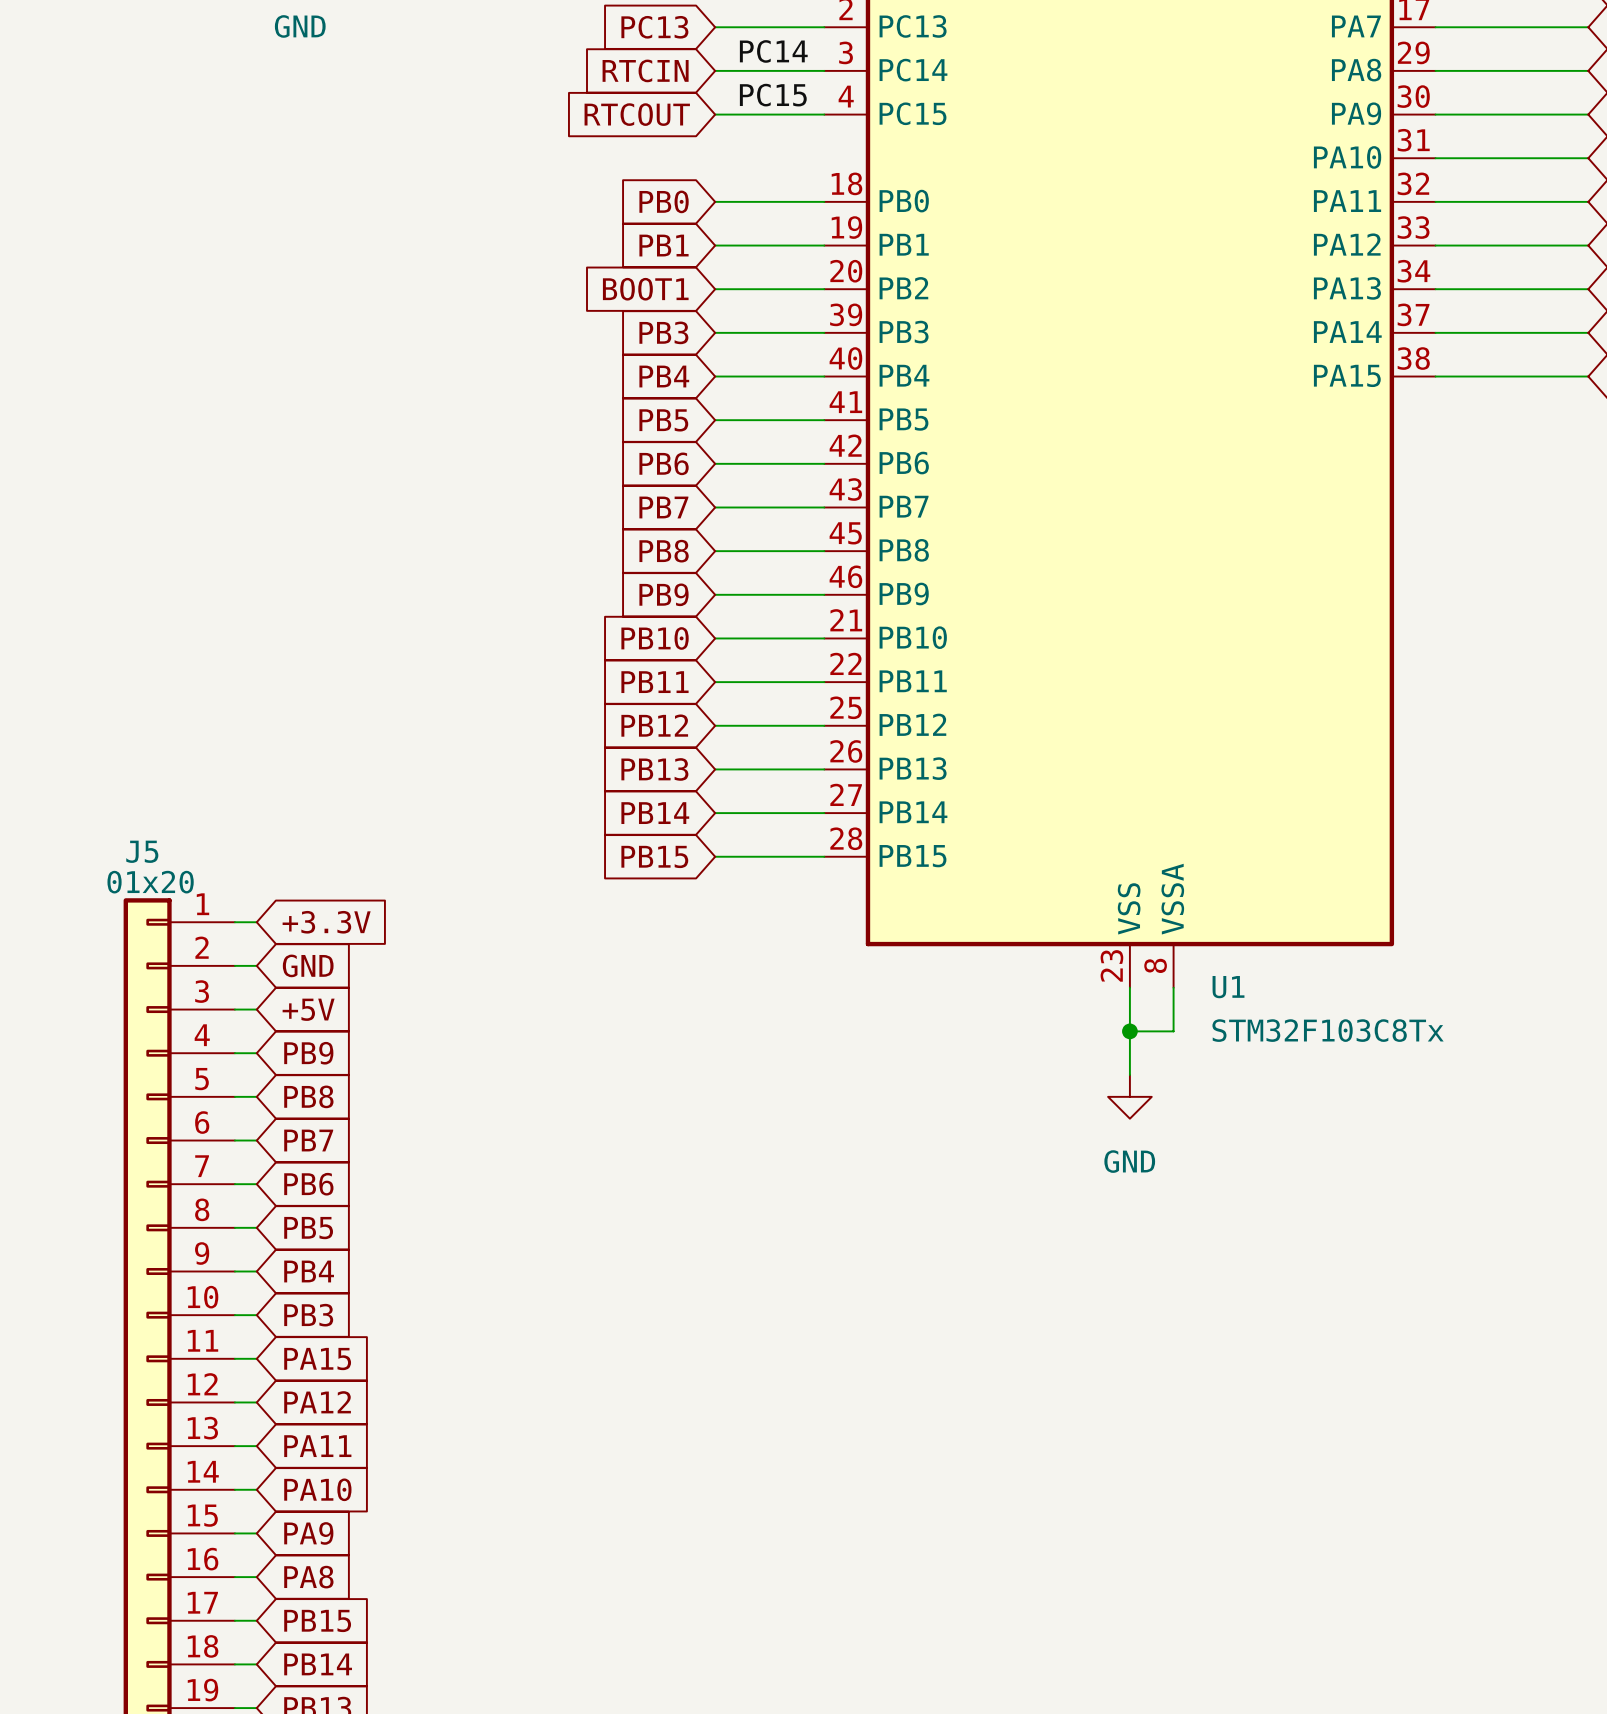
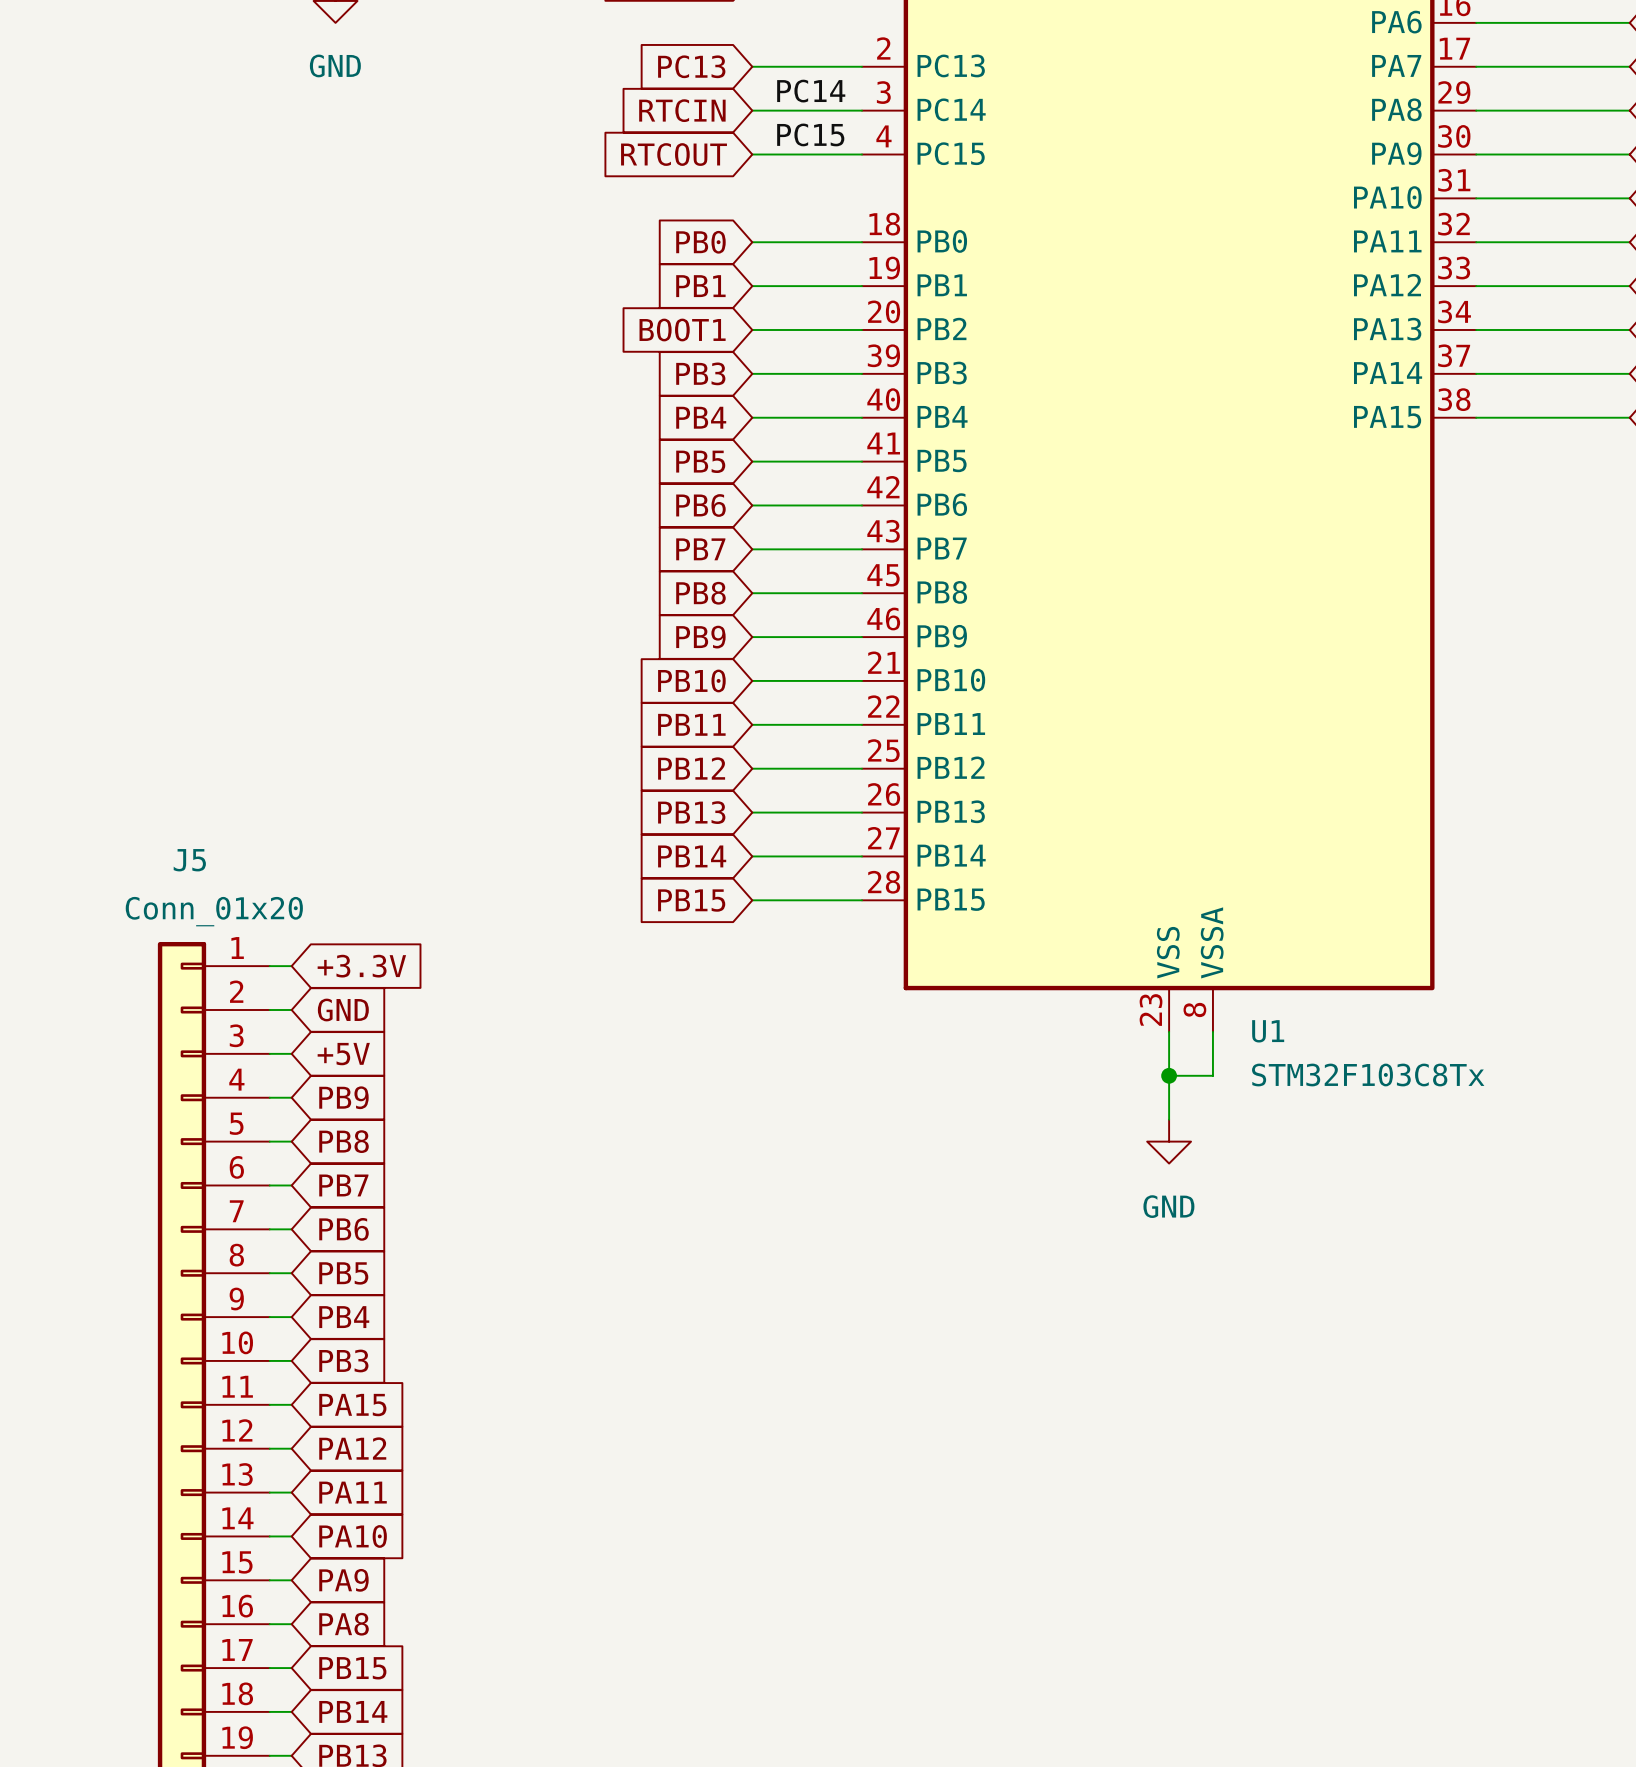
J5 name position: J5 (142, 851) -> J5 (189, 860)
J5 value: 01x20 (150, 882) -> Conn_01x20 (214, 911)

